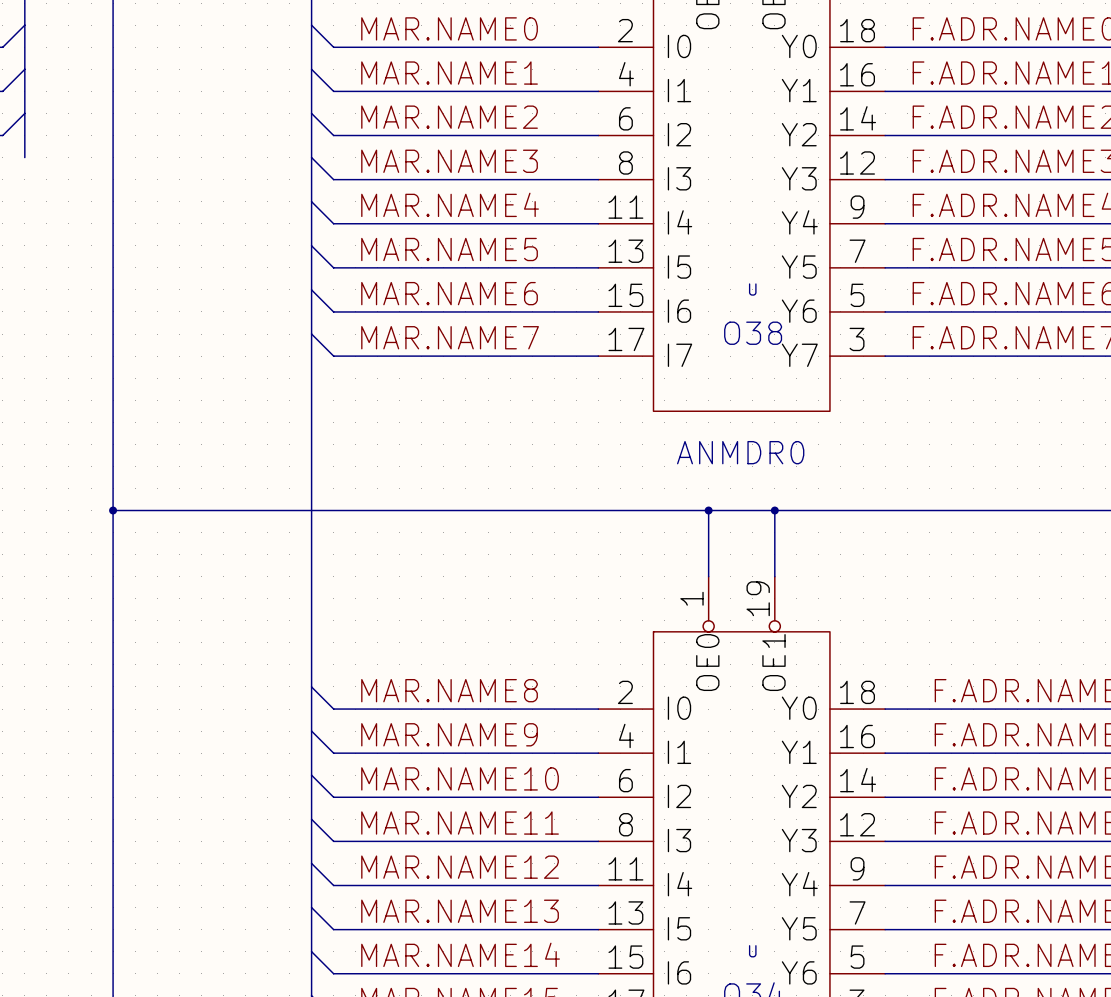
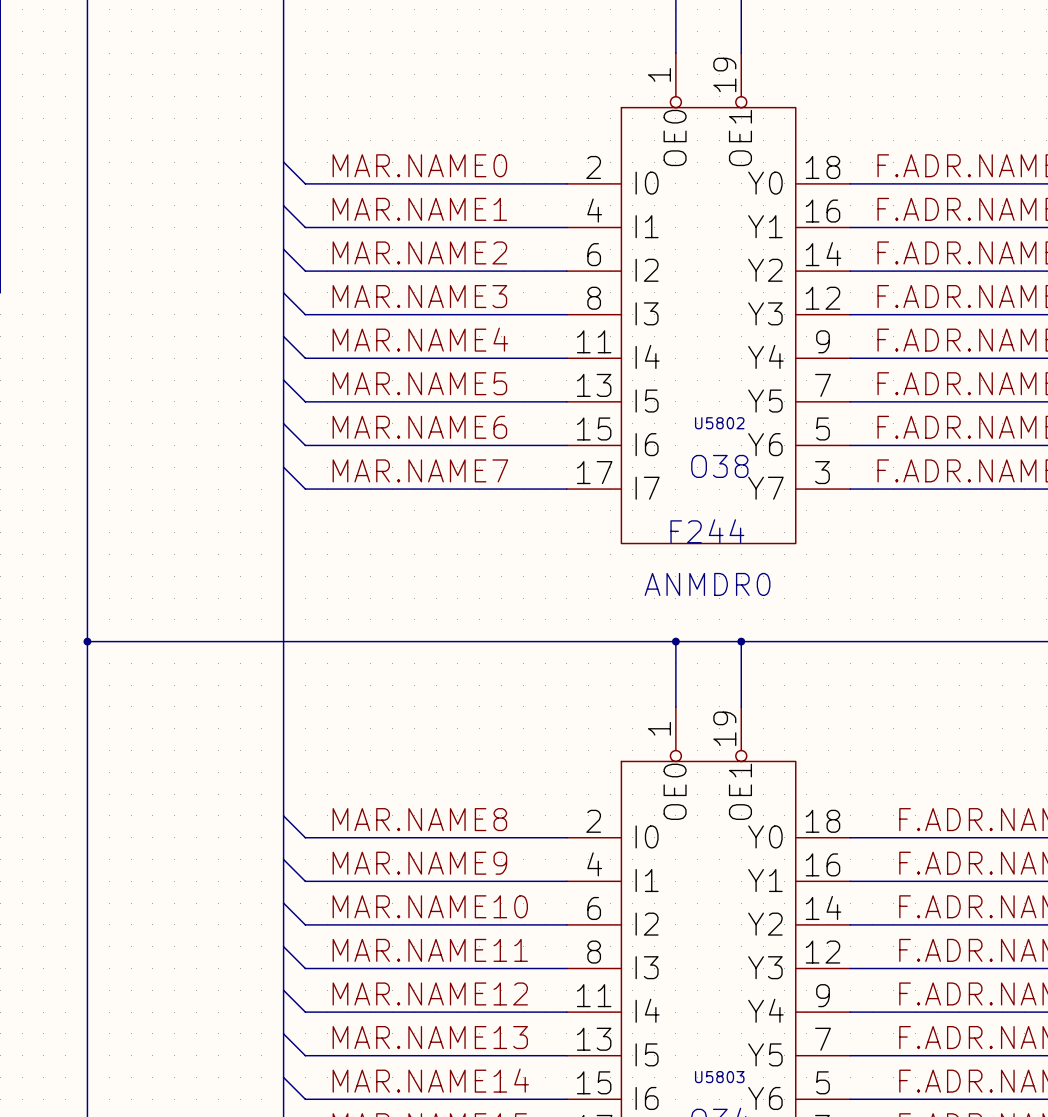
U name: U (752, 289) -> U5802 (719, 423)
U value: none -> F244 (707, 531)
U name: U (752, 951) -> U5803 (719, 1077)

